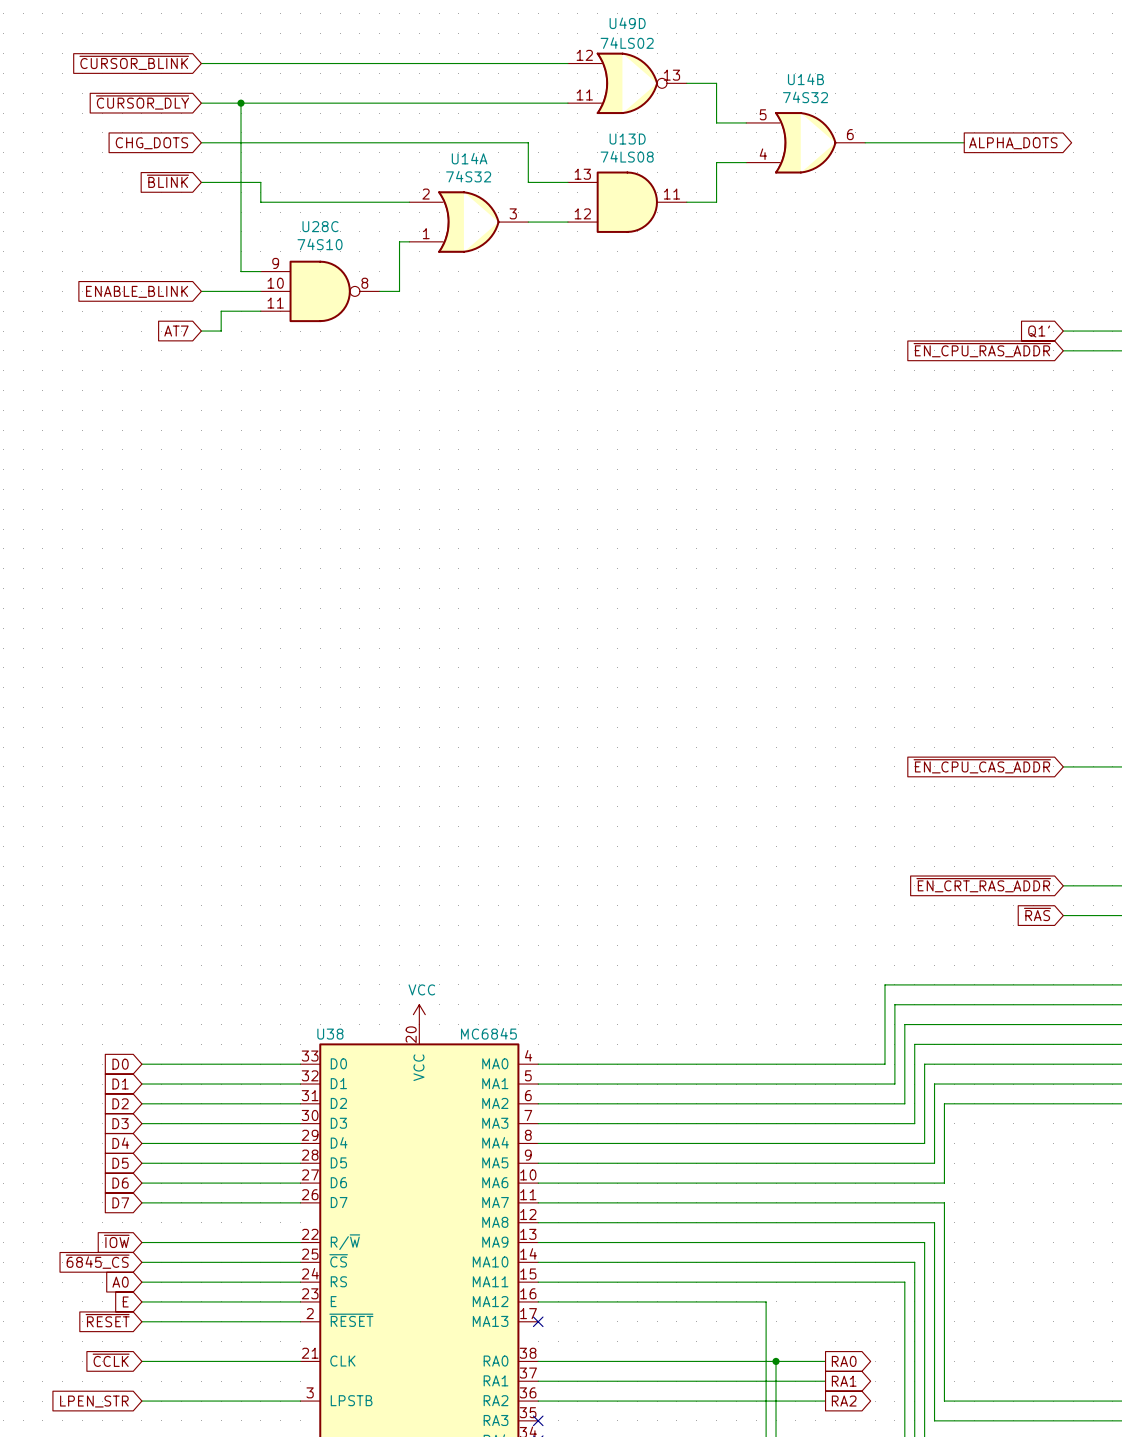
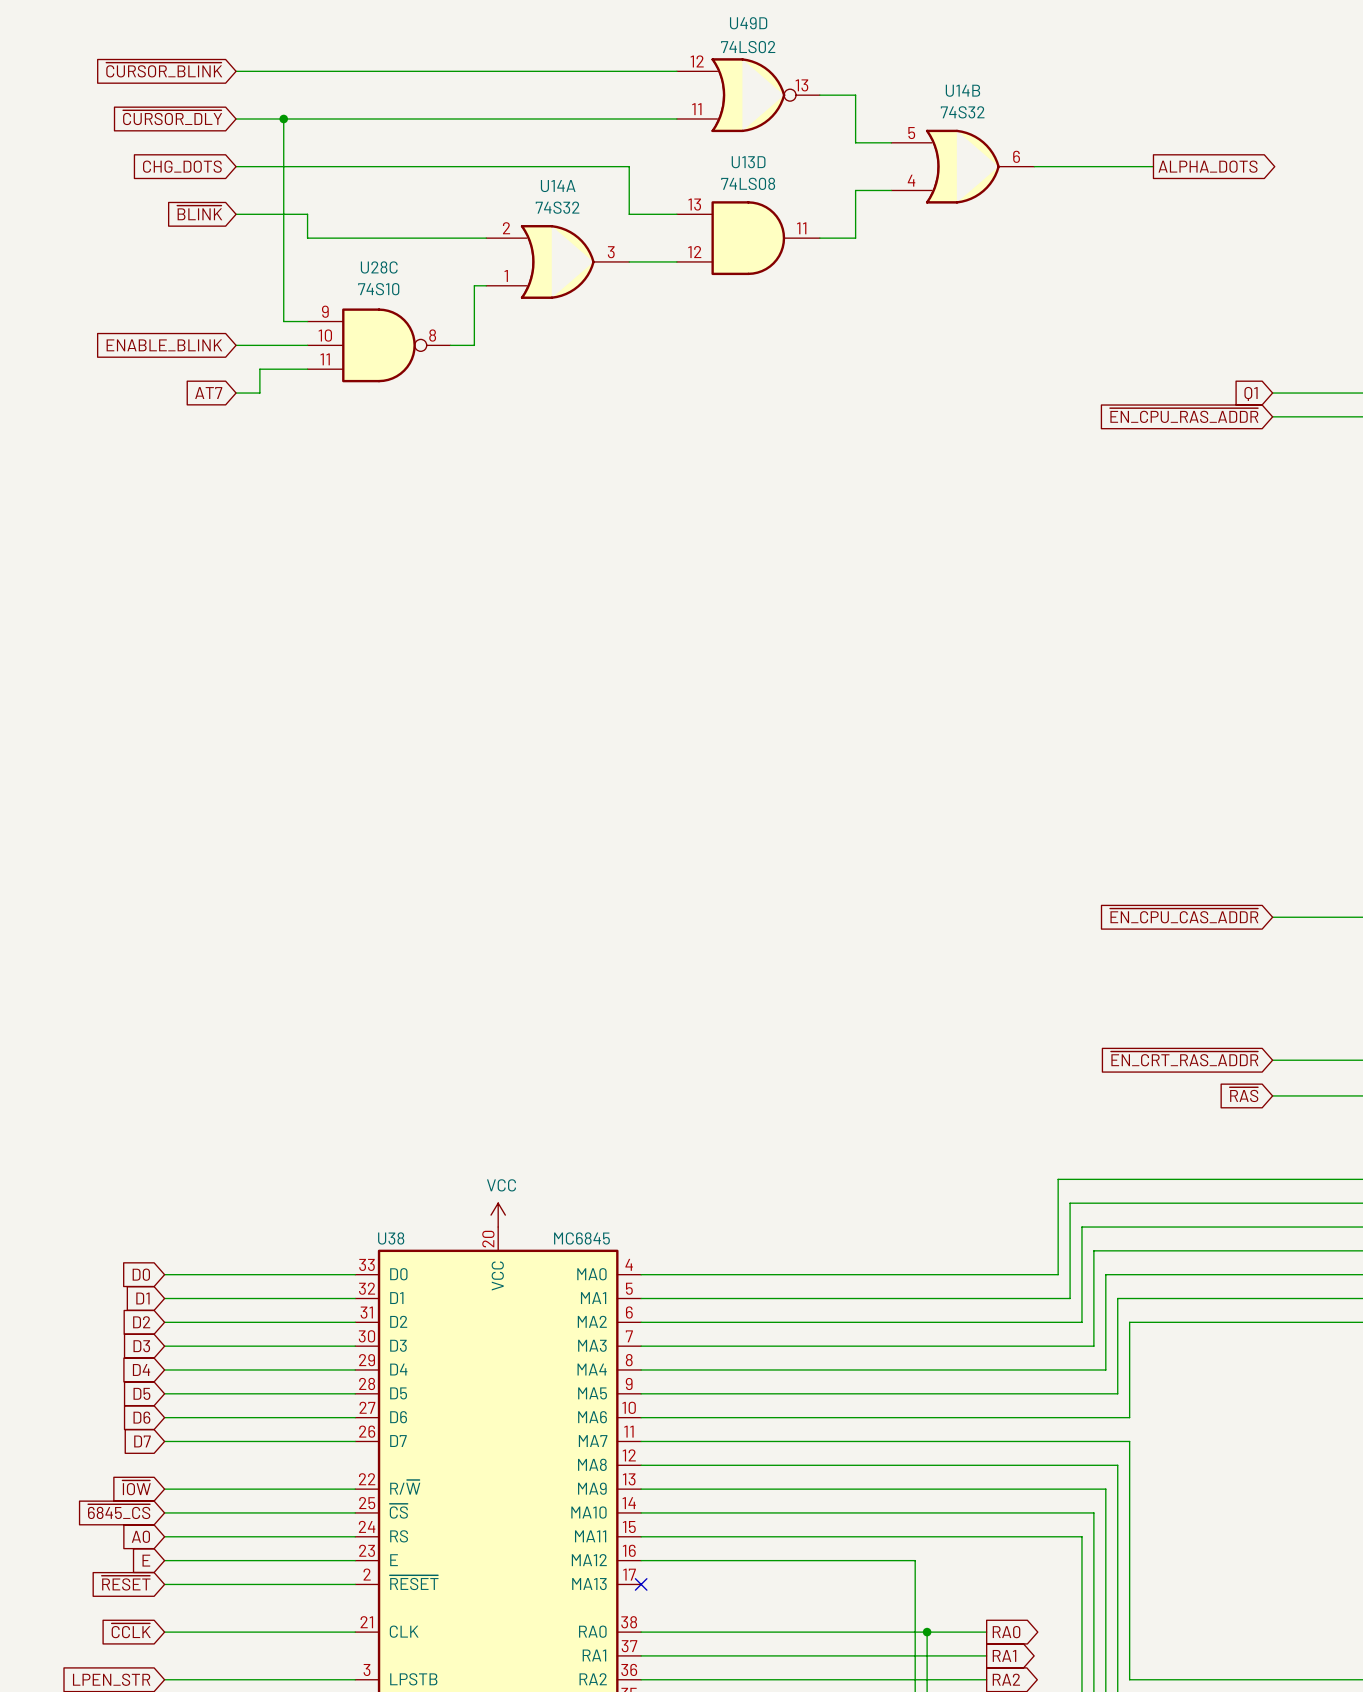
global label: Q1' (1039, 331) -> Q1 (1251, 393)

